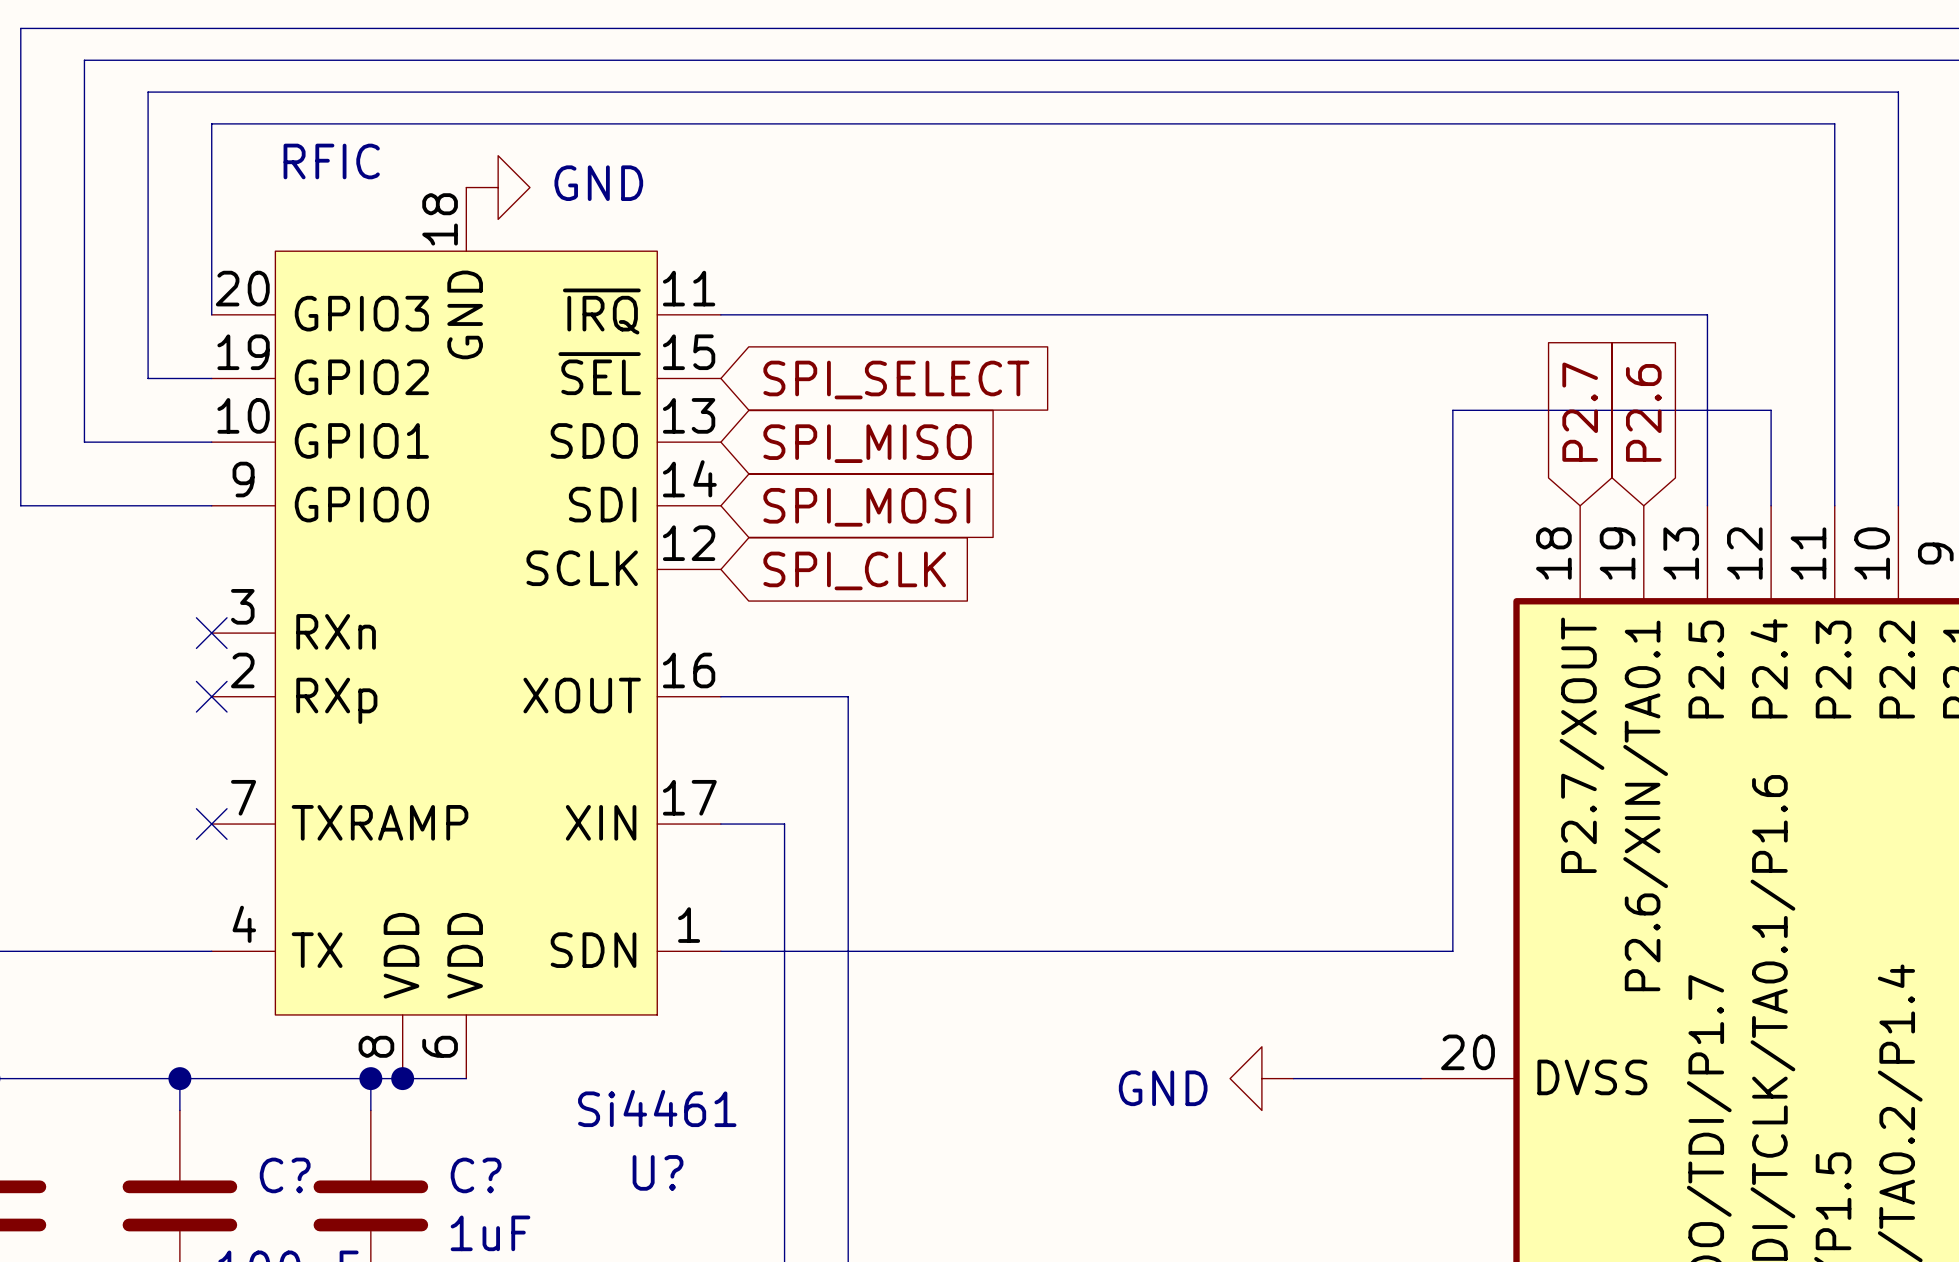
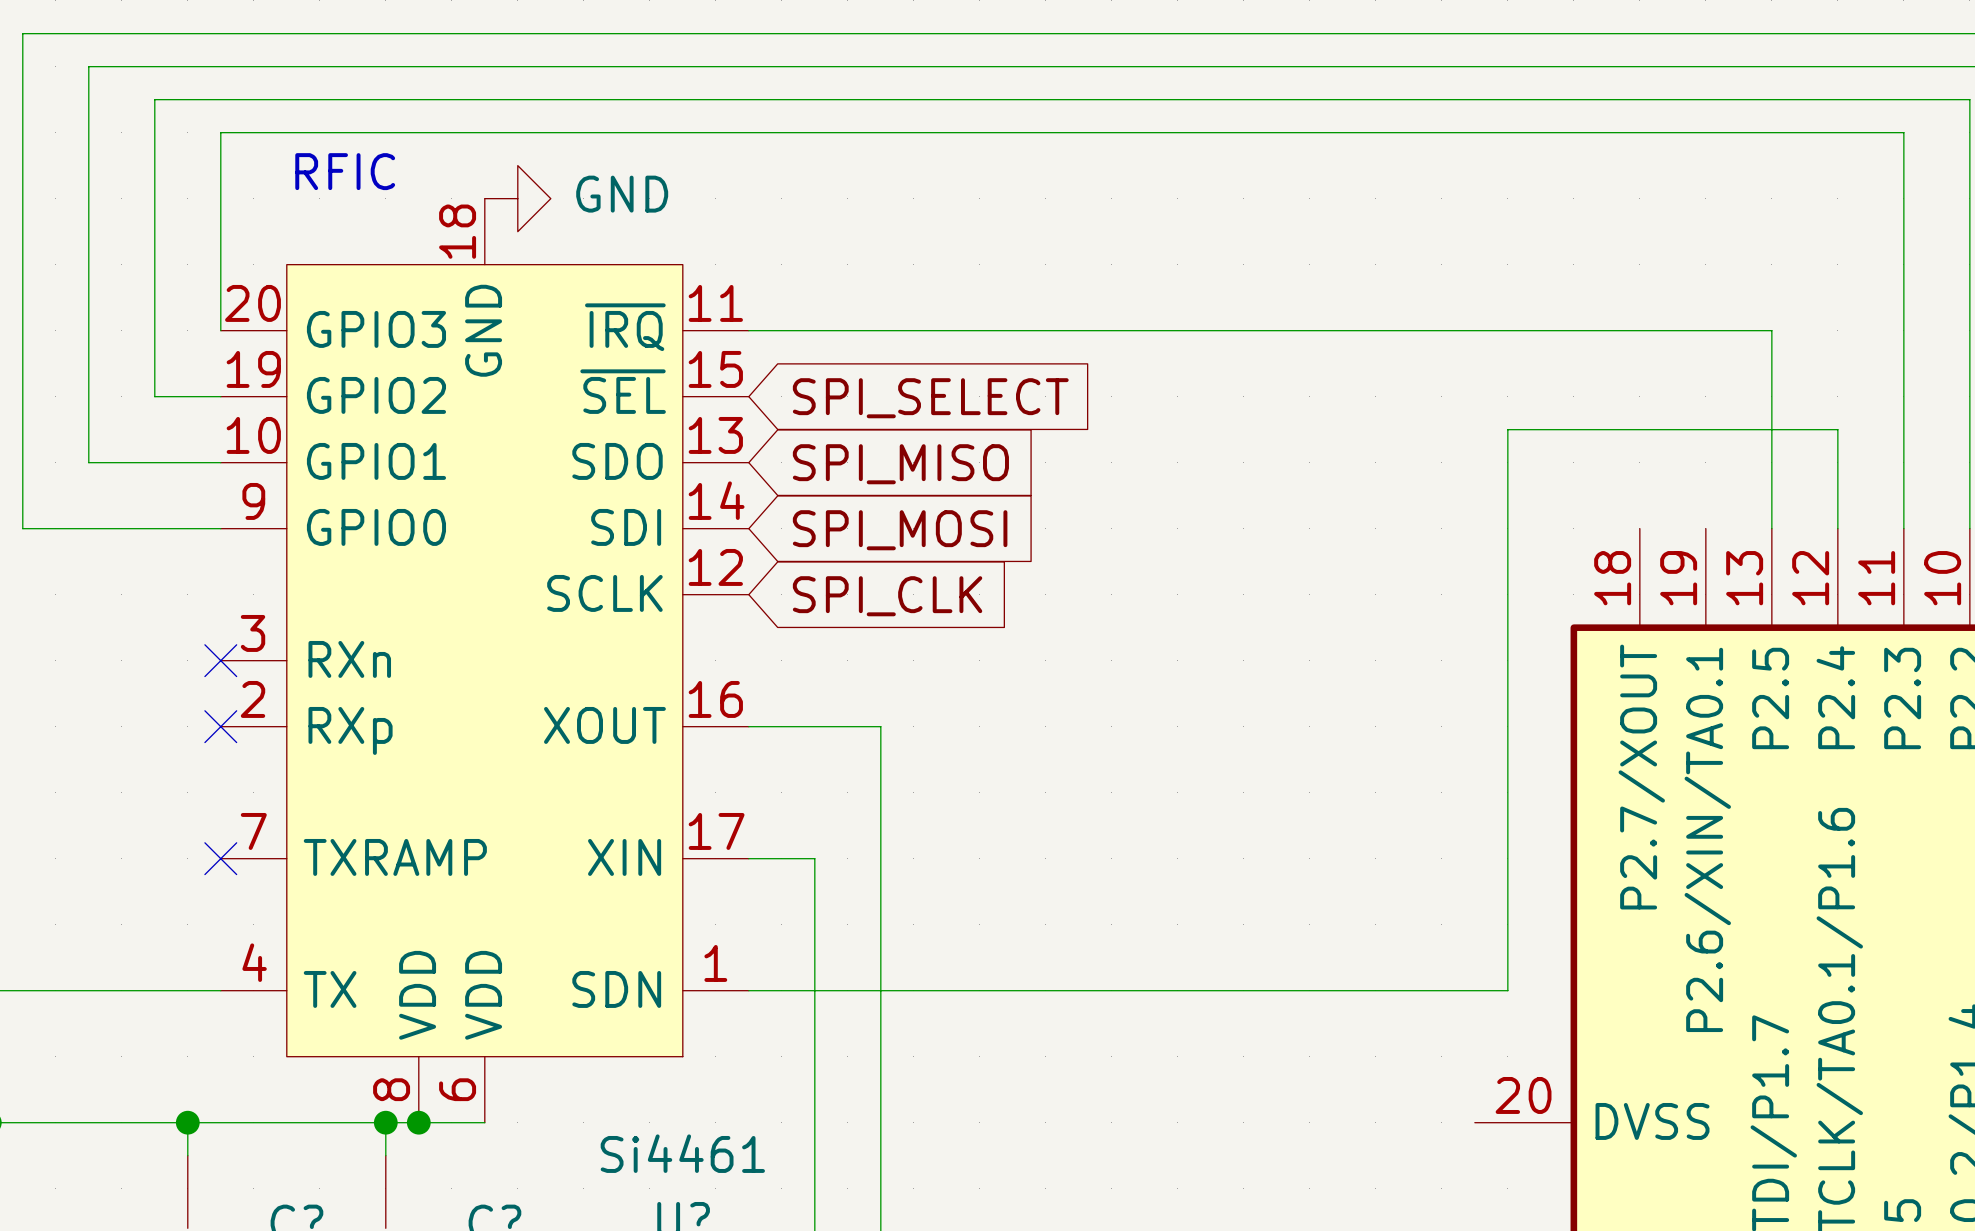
global label: P2.7 (1580, 412) -> none
global label: P2.6 (1643, 412) -> none
power symbol: GND (1261, 1078) -> none
wire: (1293, 1078) (1421, 1078) -> none

